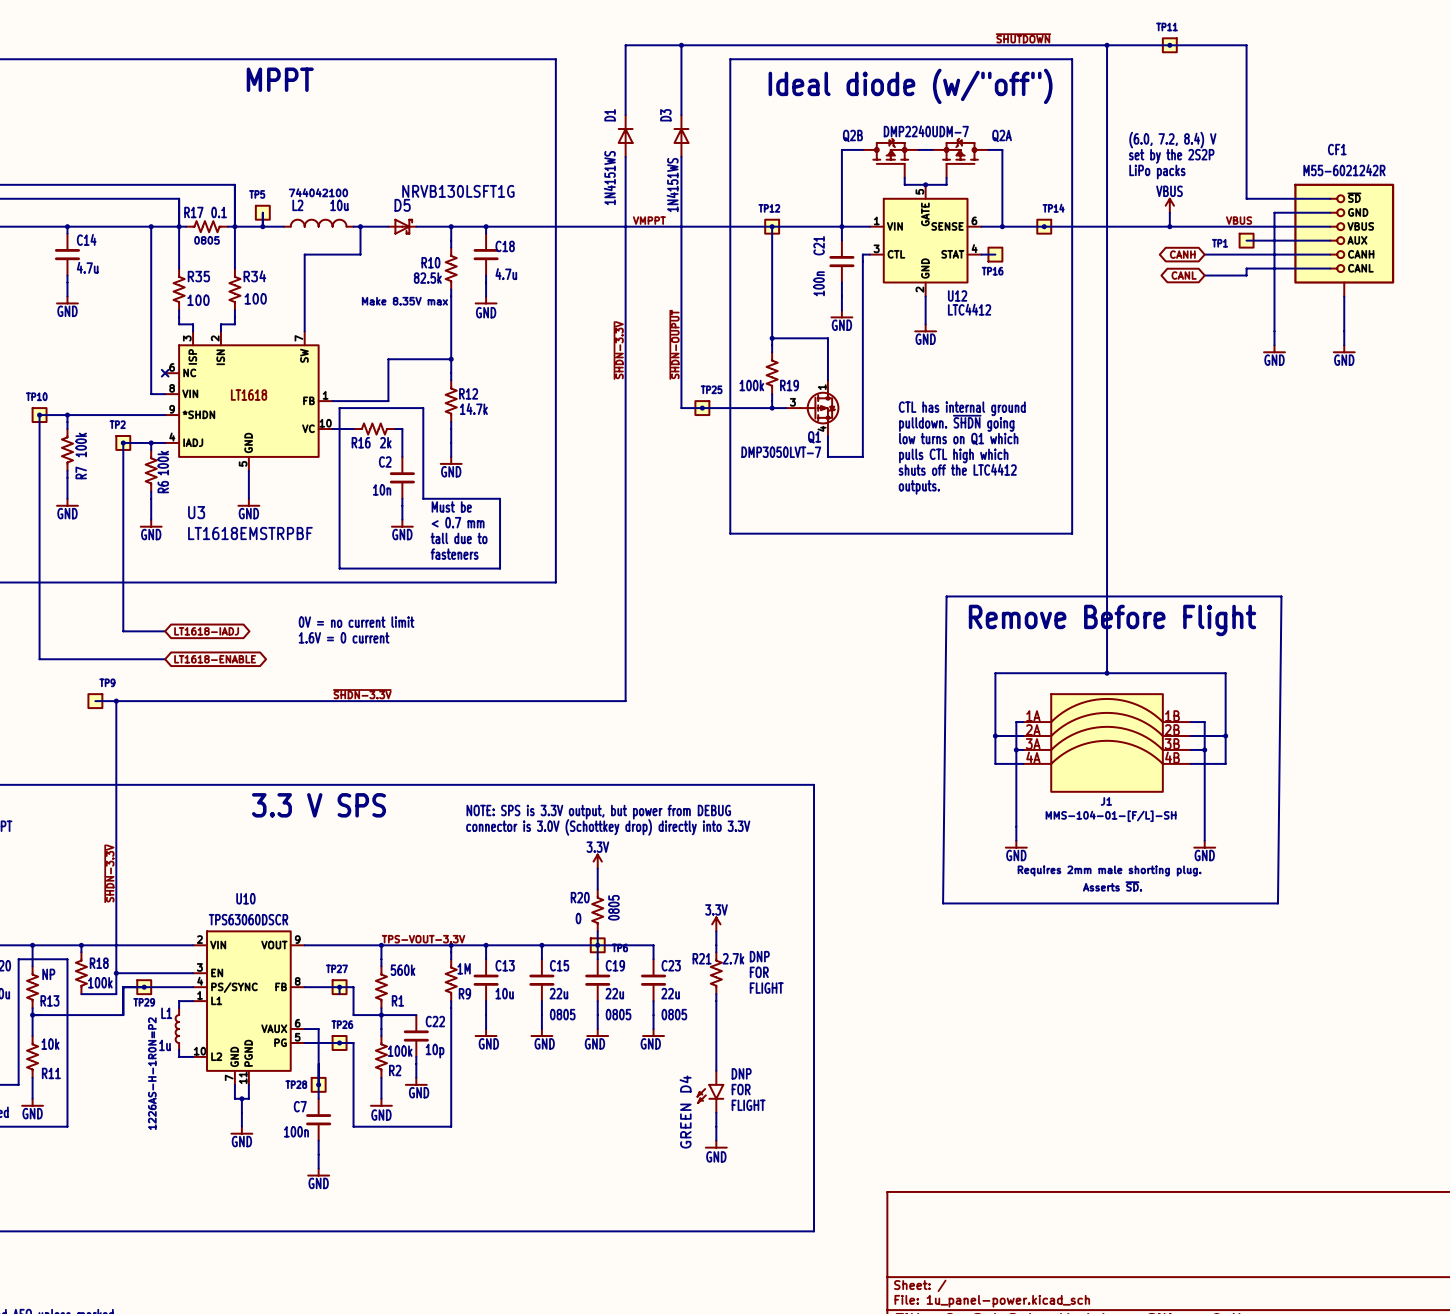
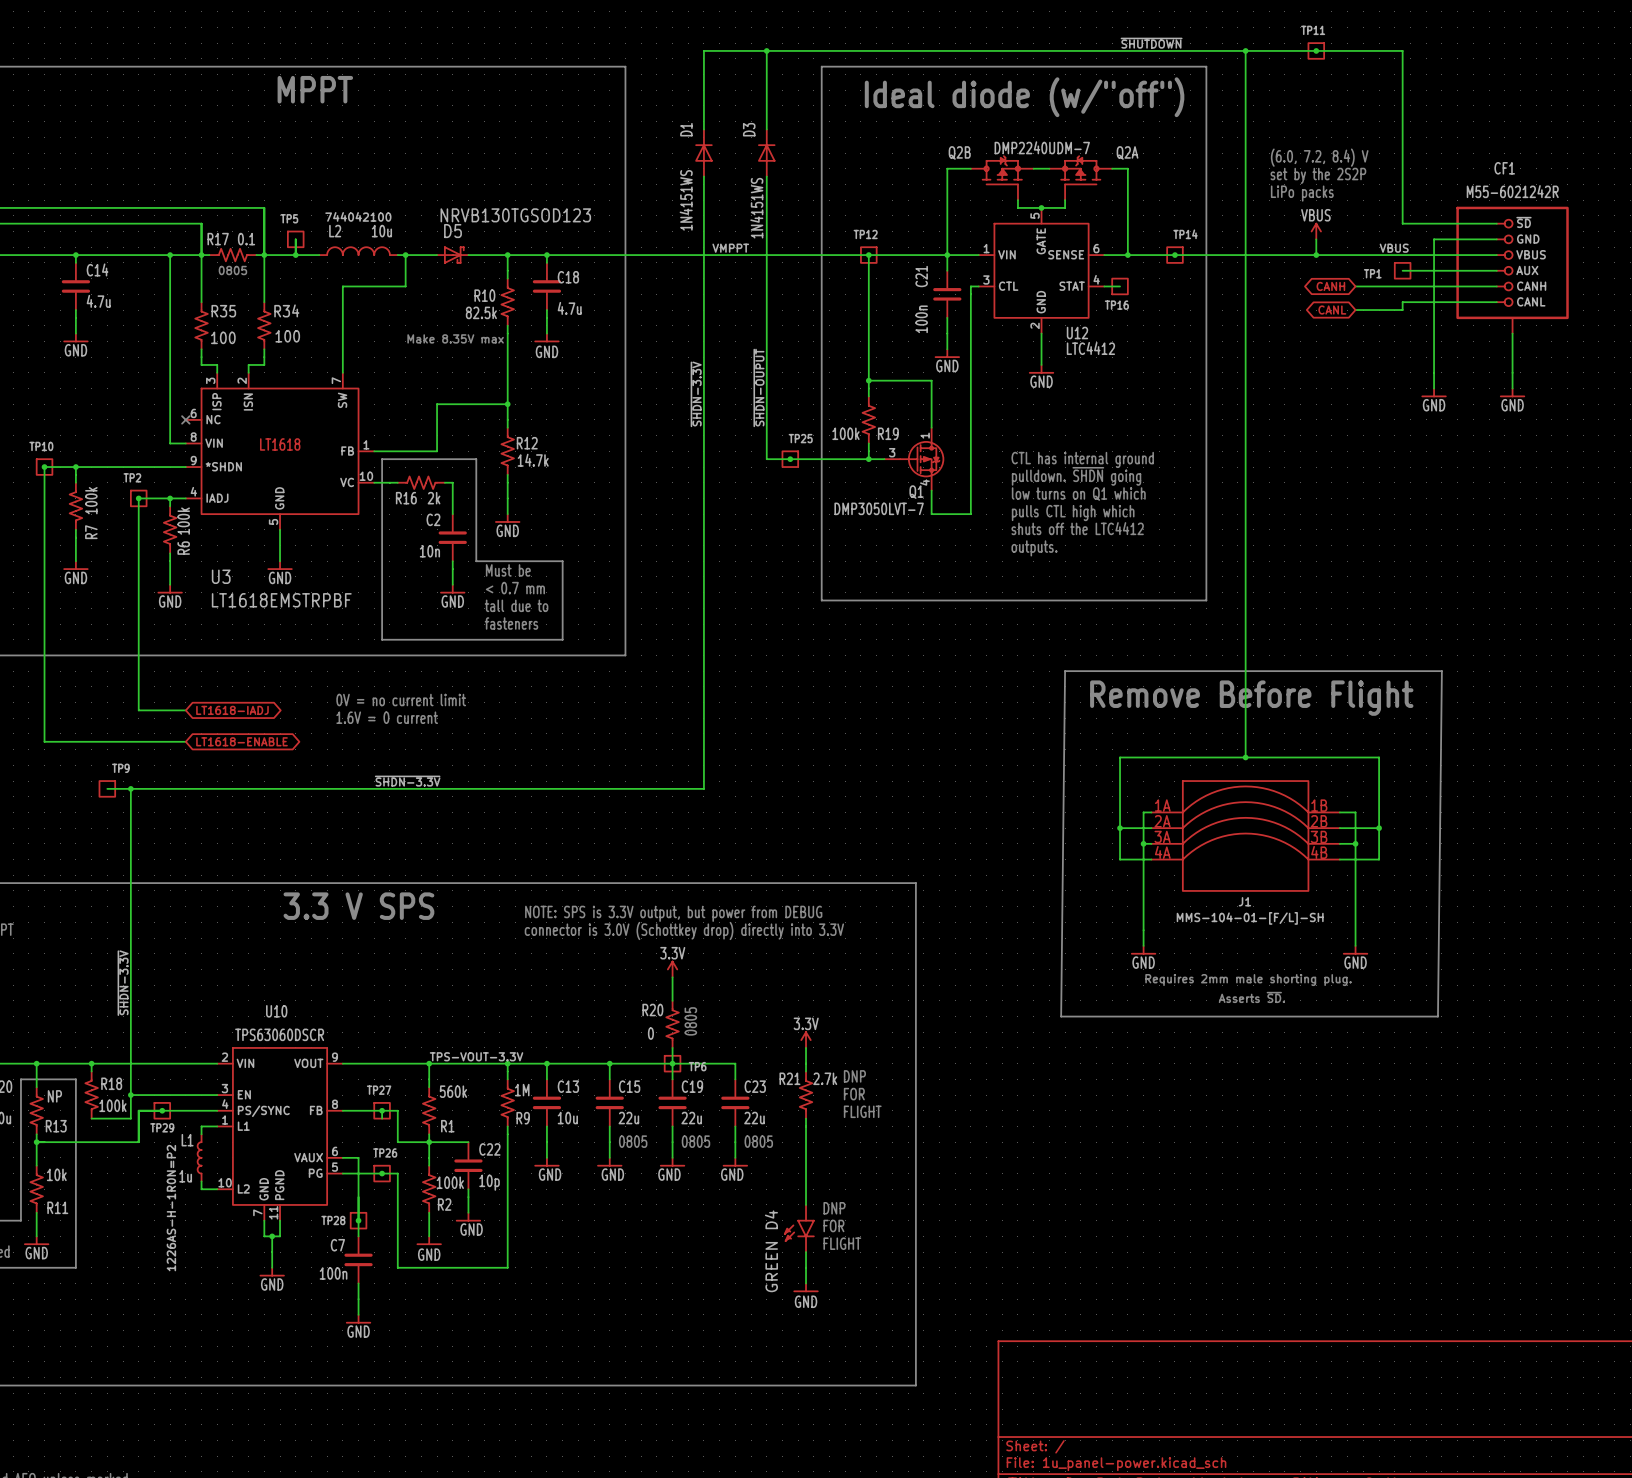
D5 value: NRVB130LSFT1G (458, 191) -> NRVB130TGSOD123 (515, 215)

